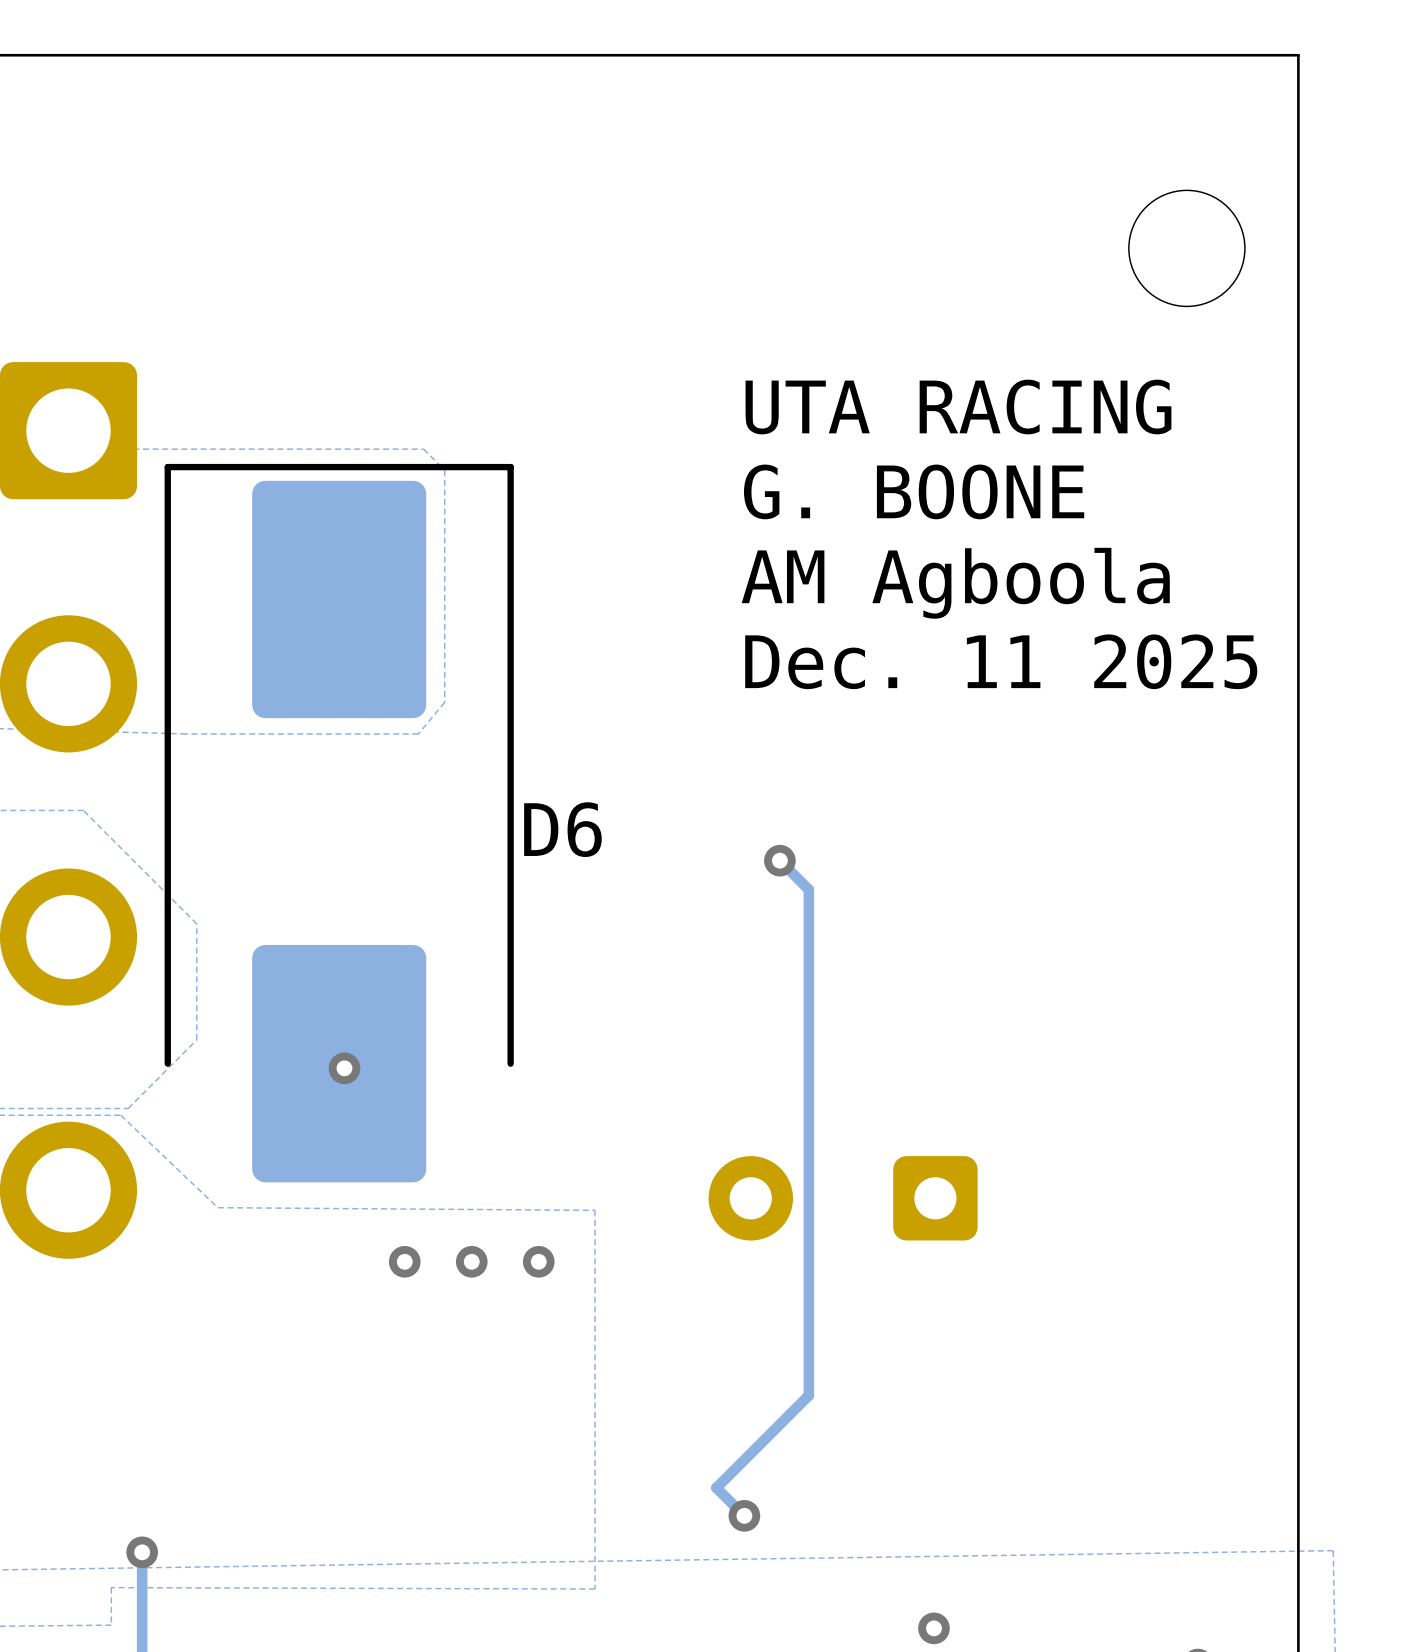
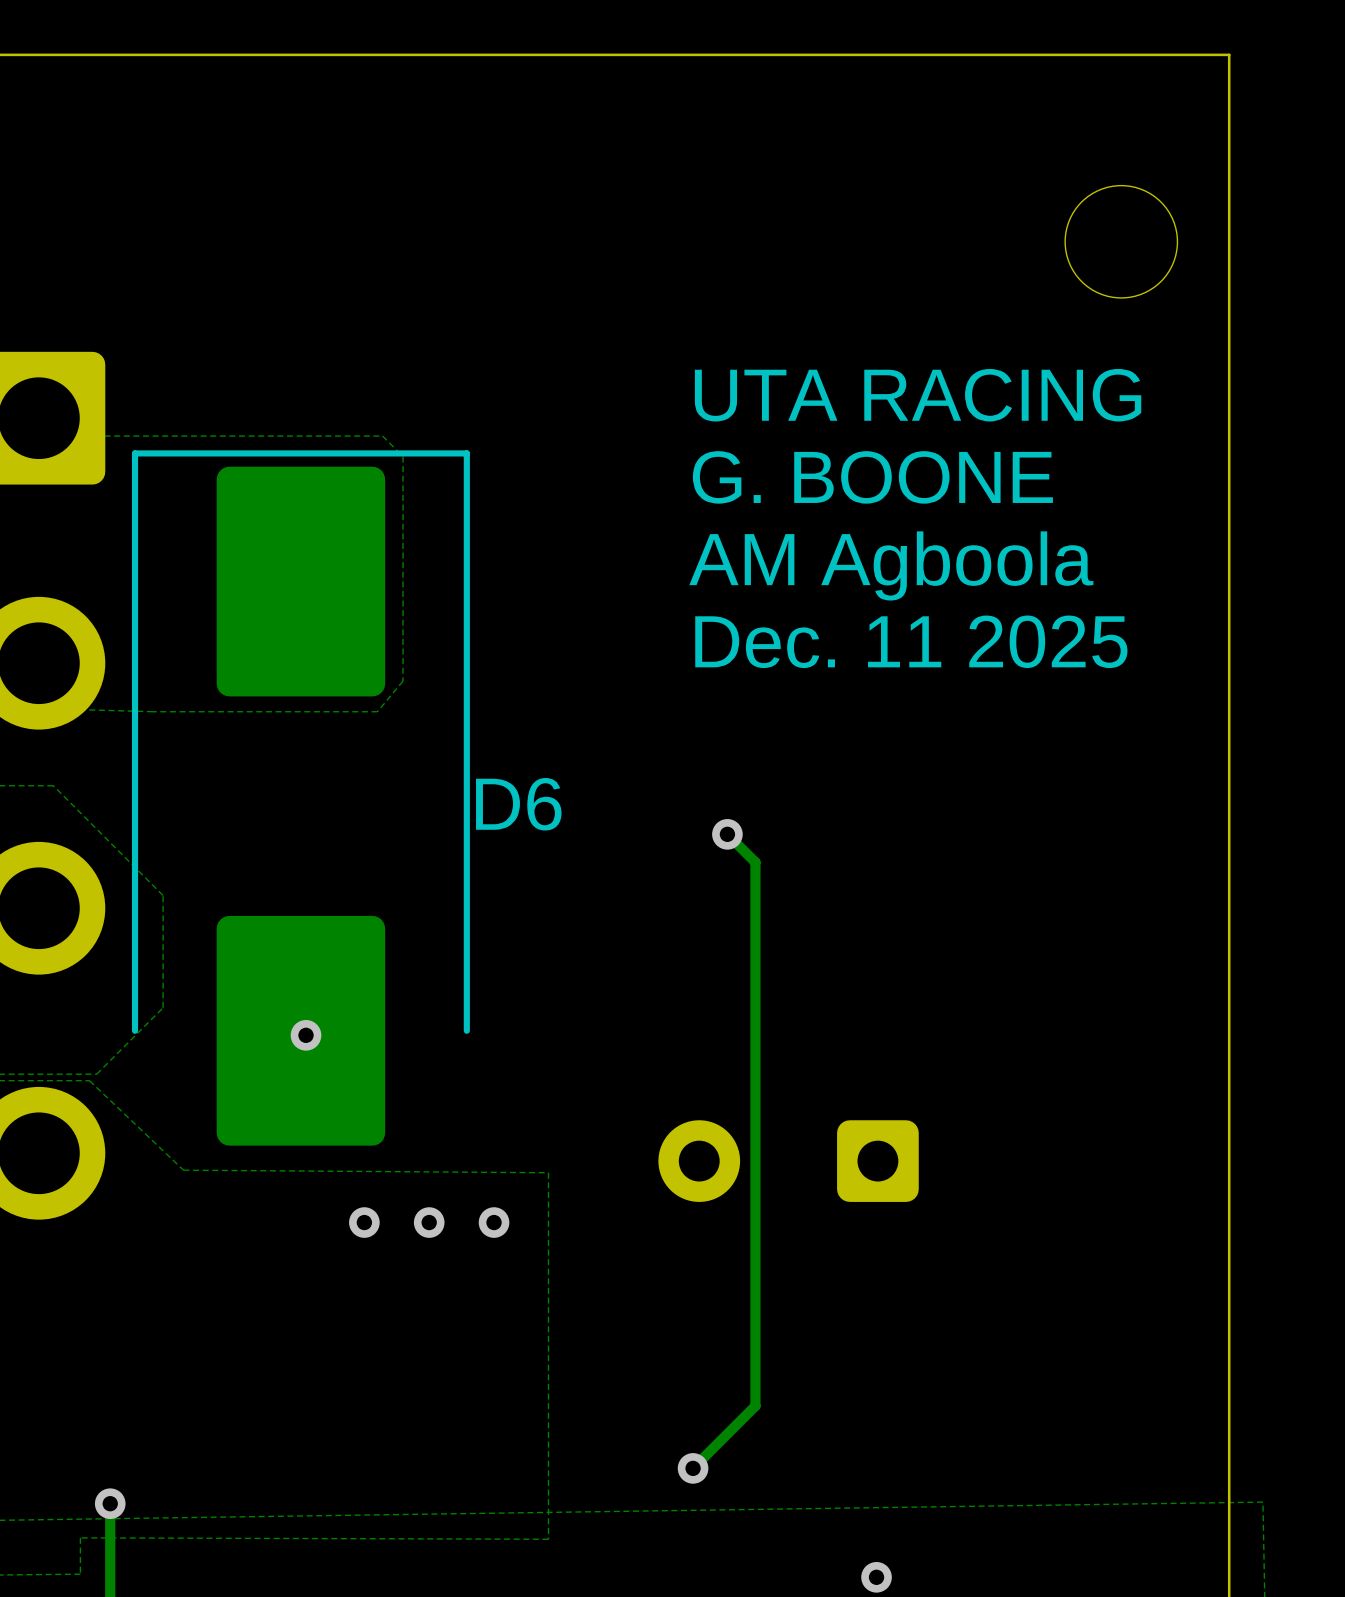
track: (808, 1395) (716, 1487) (744, 1515) -> (755, 1351) (755, 1406) (693, 1468)

